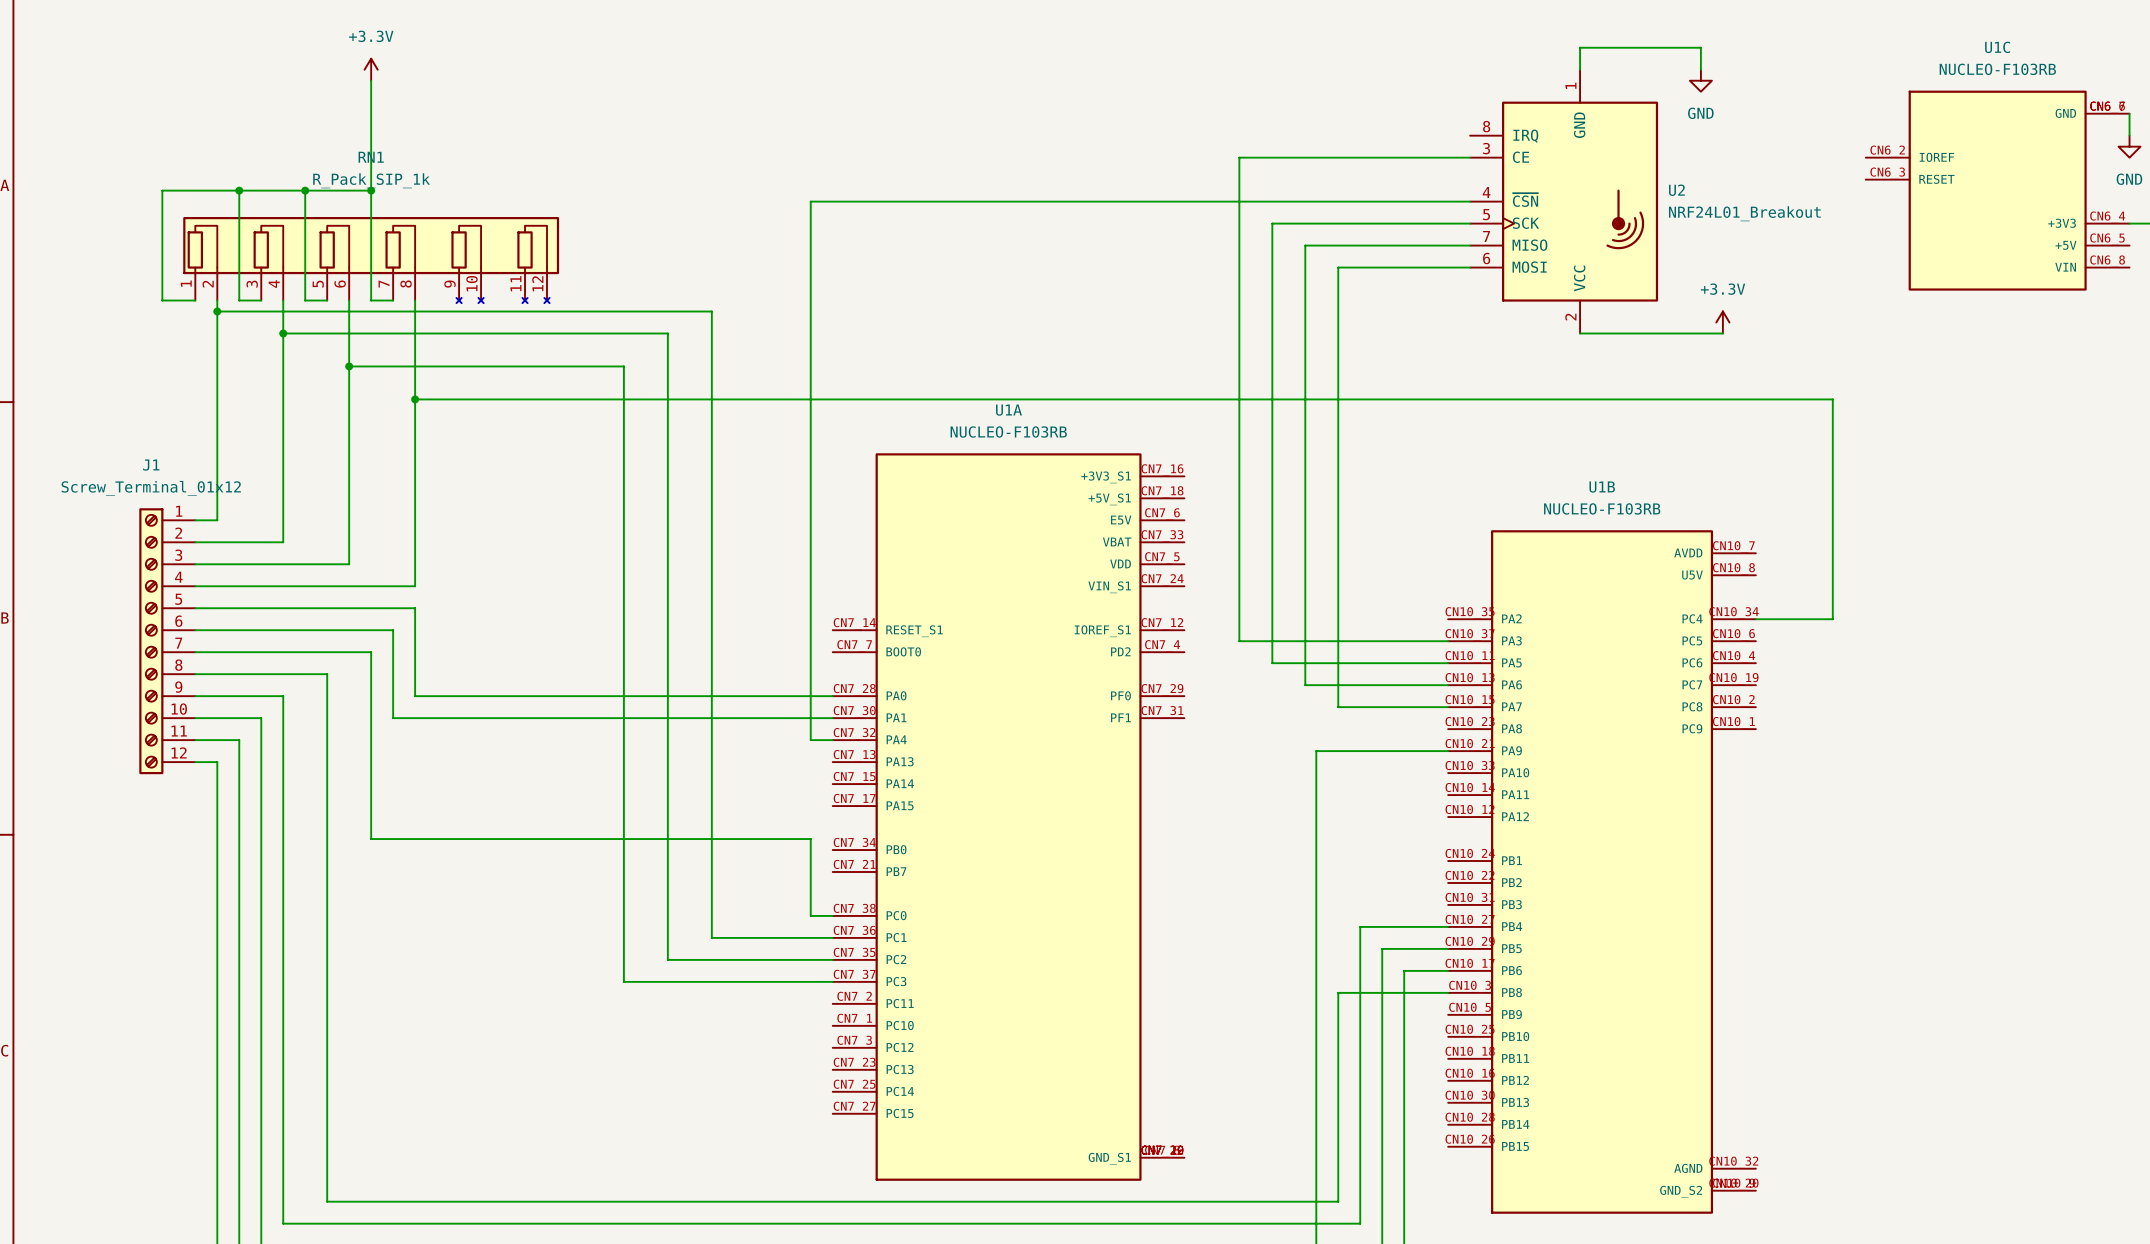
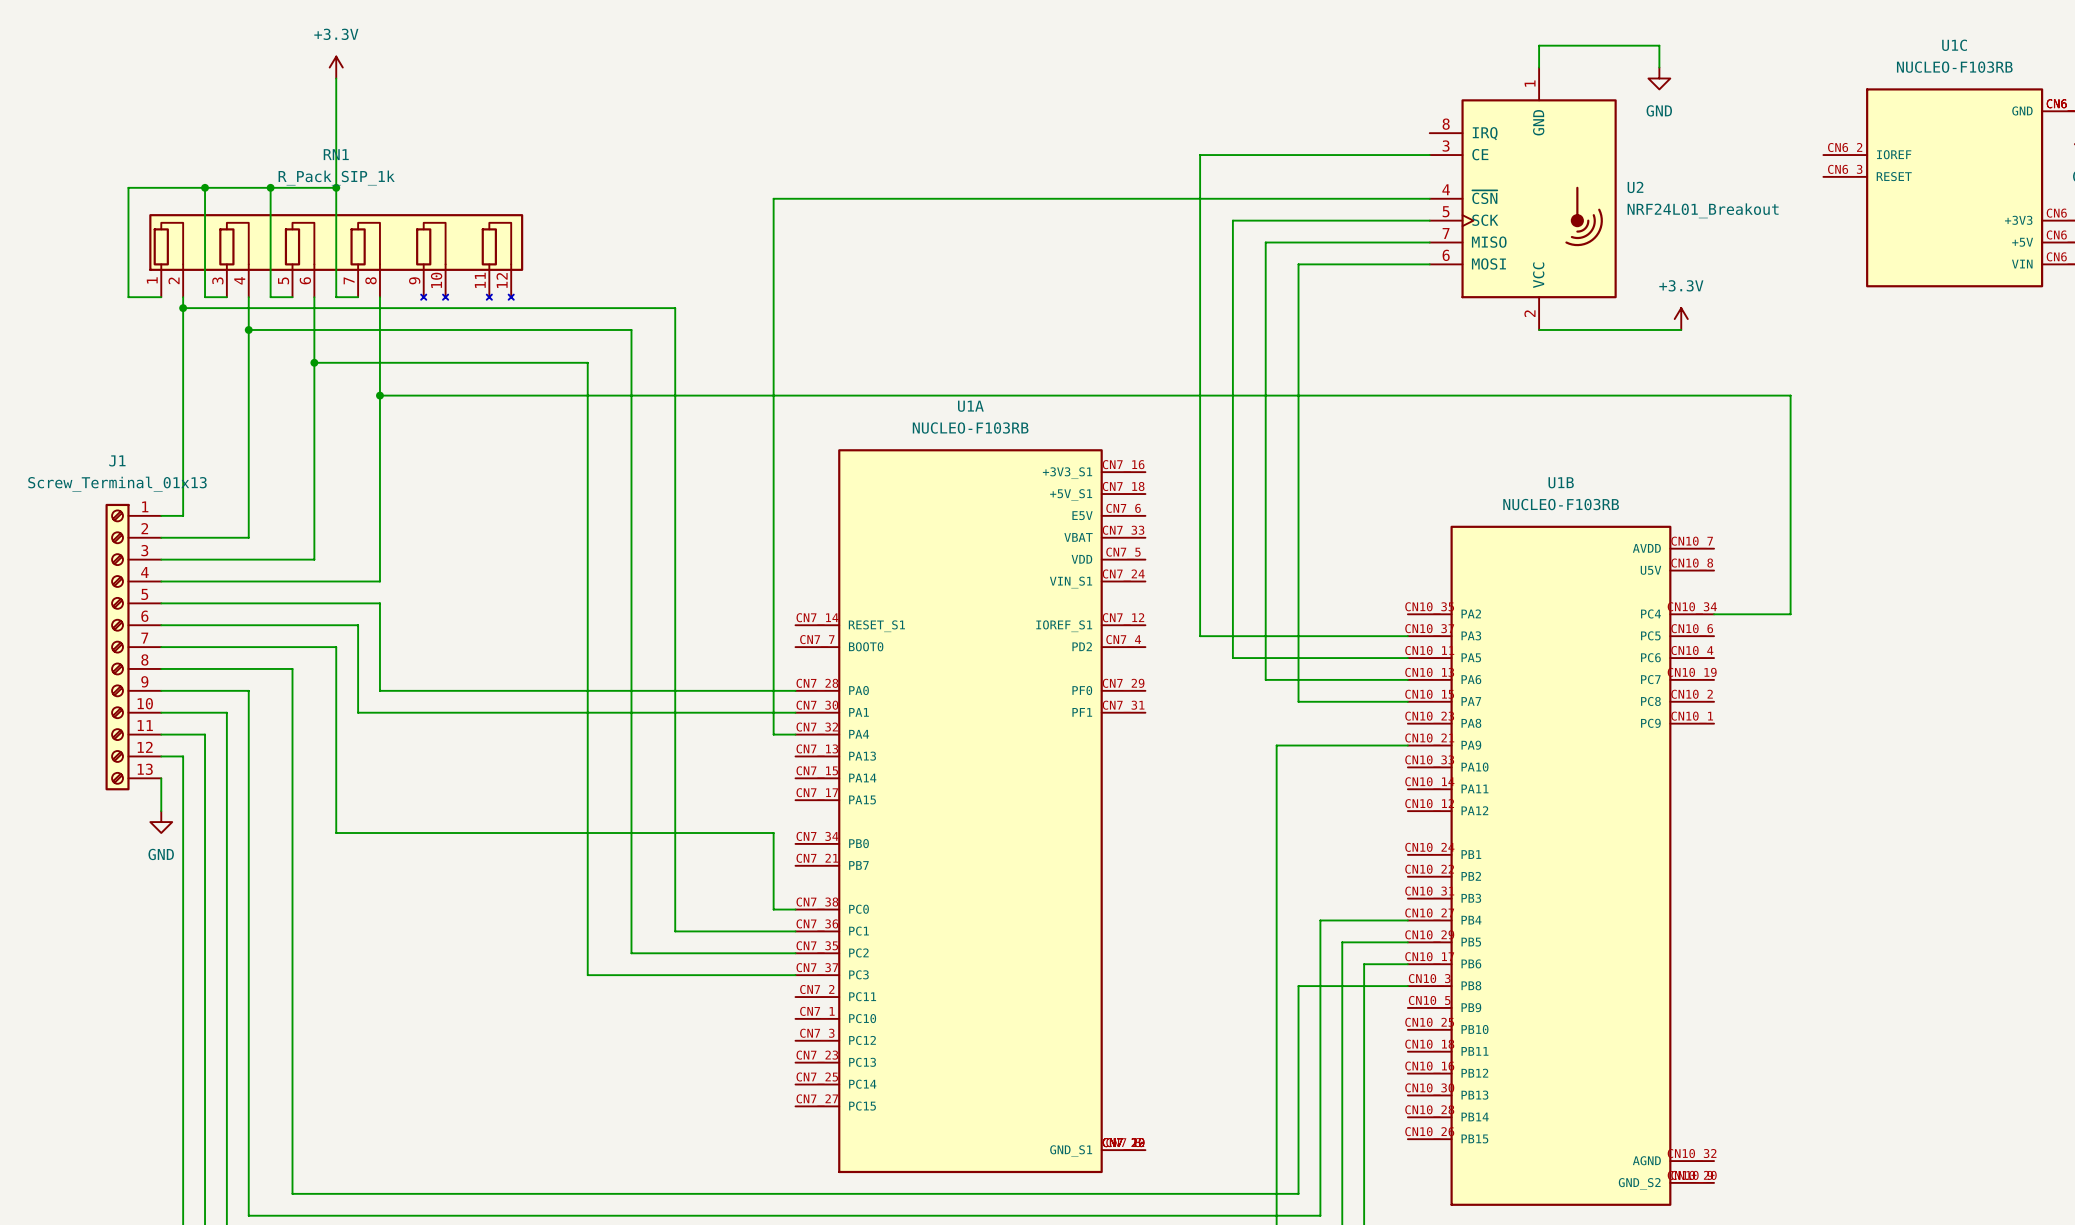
J1 value: Screw_Terminal_01x12 (151, 488) -> Screw_Terminal_01x13 (117, 484)
J1 symbol: [139, 508, 196, 775] -> [105, 503, 162, 791]
wire: none -> (161, 778) (161, 811)
power symbol: none -> GND (161, 822)

